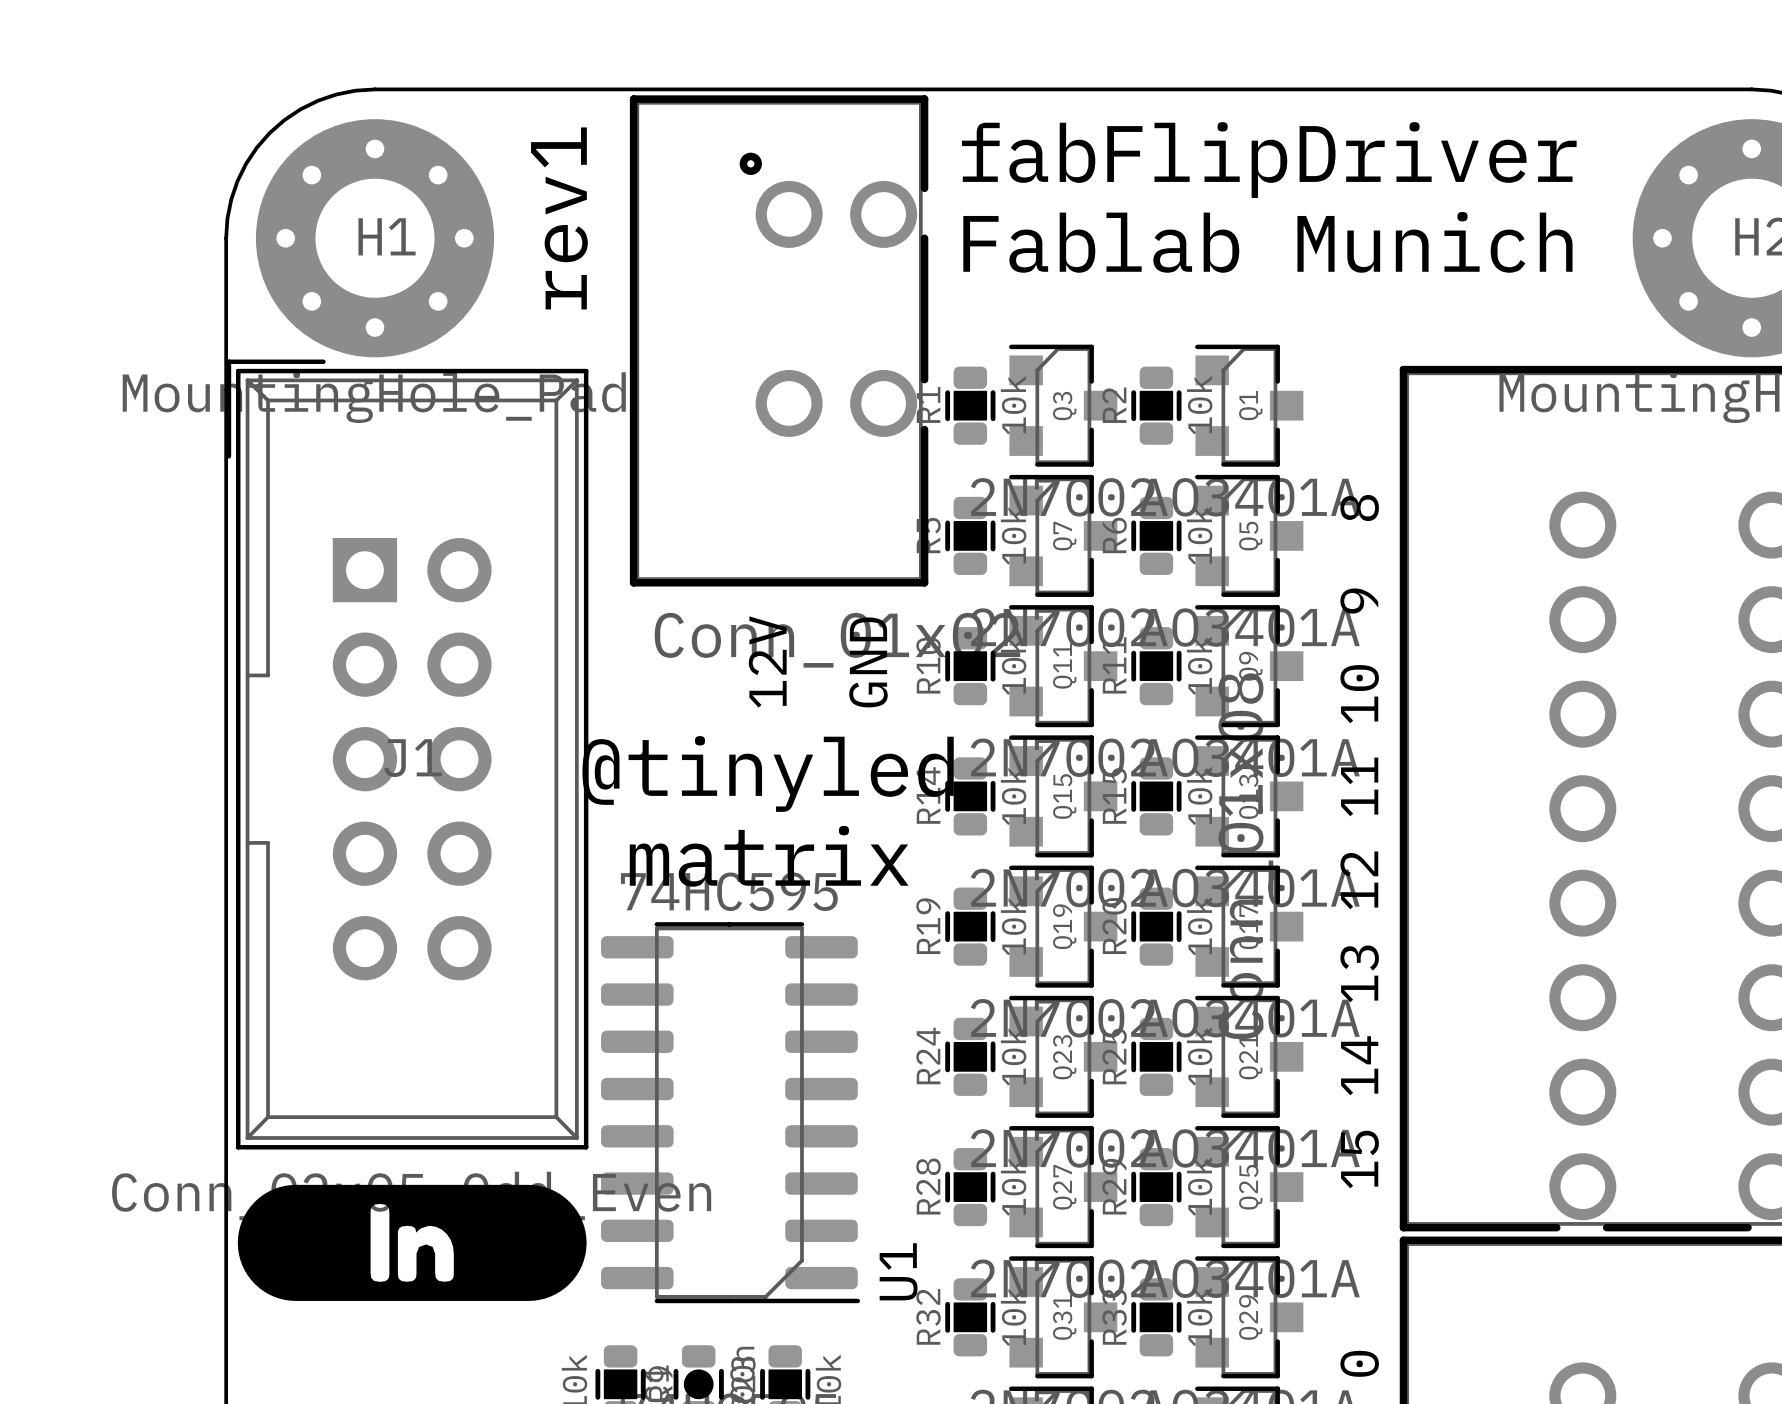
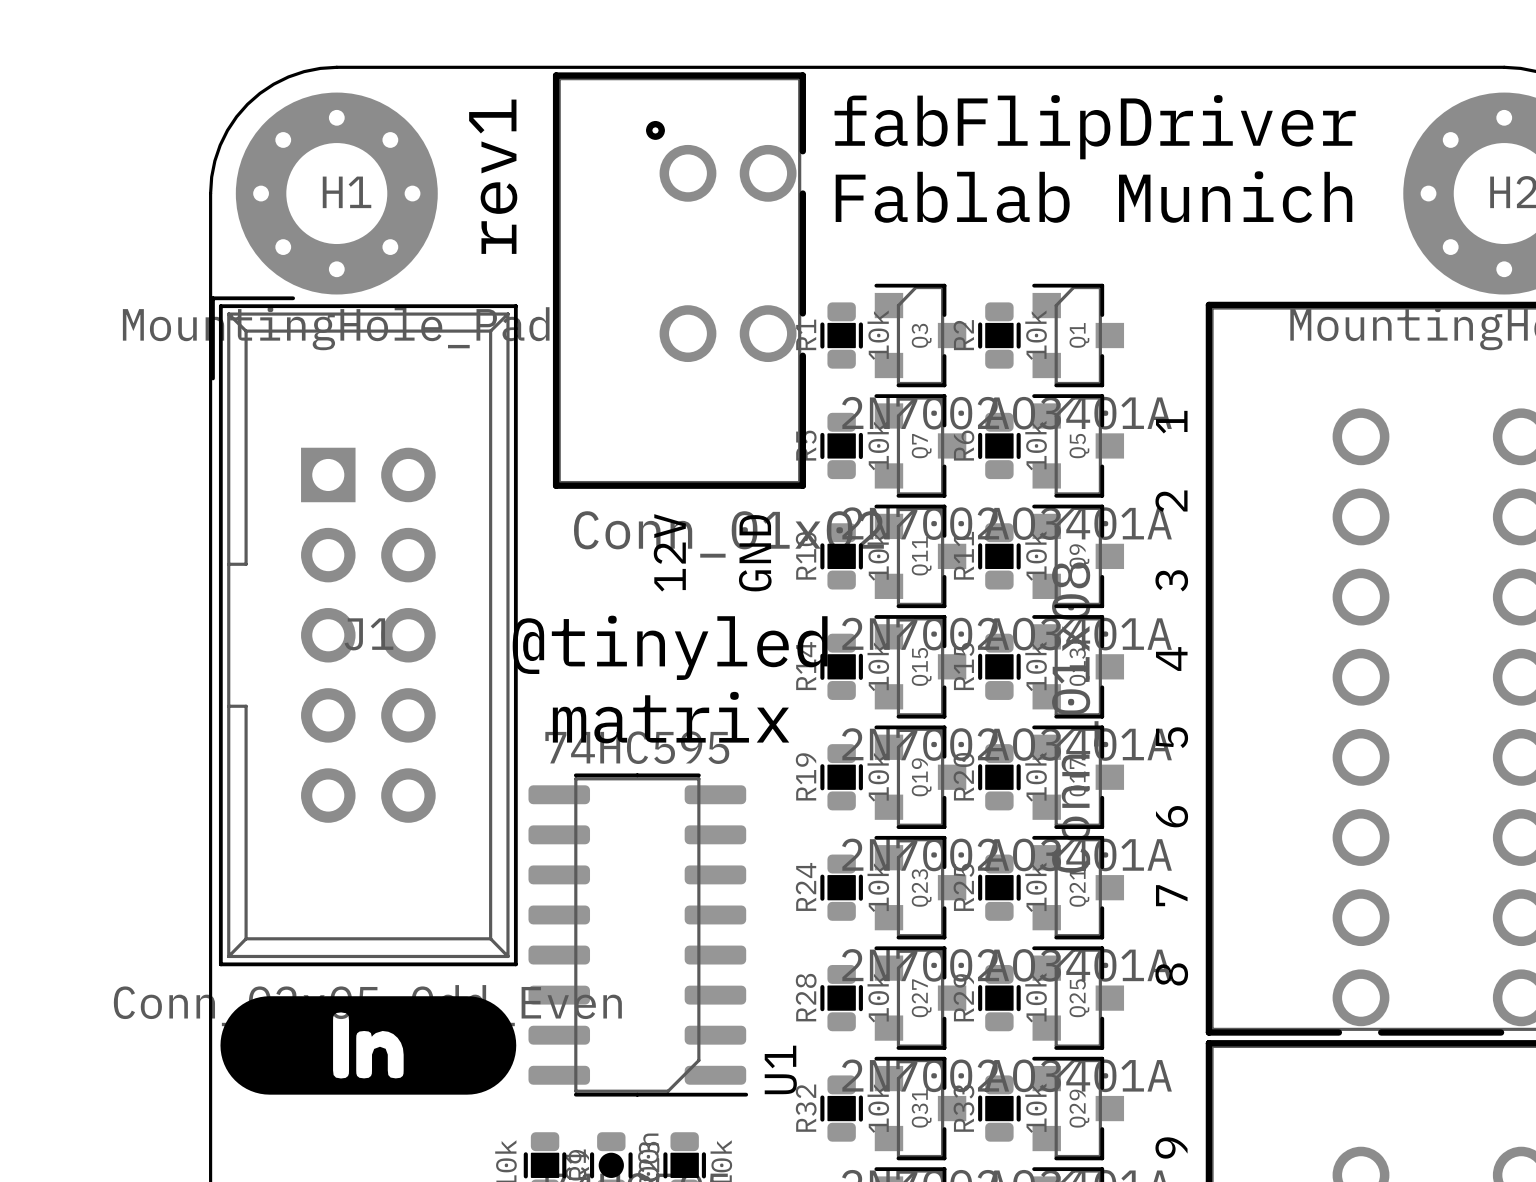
text: 8 (1359, 508) -> 1 (1171, 422)
text: 9 (1359, 601) -> 2 (1171, 501)
text: 10 (1359, 694) -> 3 (1171, 580)
text: 11 (1359, 786) -> 4 (1171, 659)
text: 12 (1359, 880) -> 5 (1172, 737)
text: 13 (1359, 973) -> 6 (1172, 816)
text: 14 (1359, 1065) -> 7 (1171, 895)
text: 15 (1359, 1159) -> 8 (1171, 974)
text: 0 (1359, 1363) -> 9 (1171, 1147)

